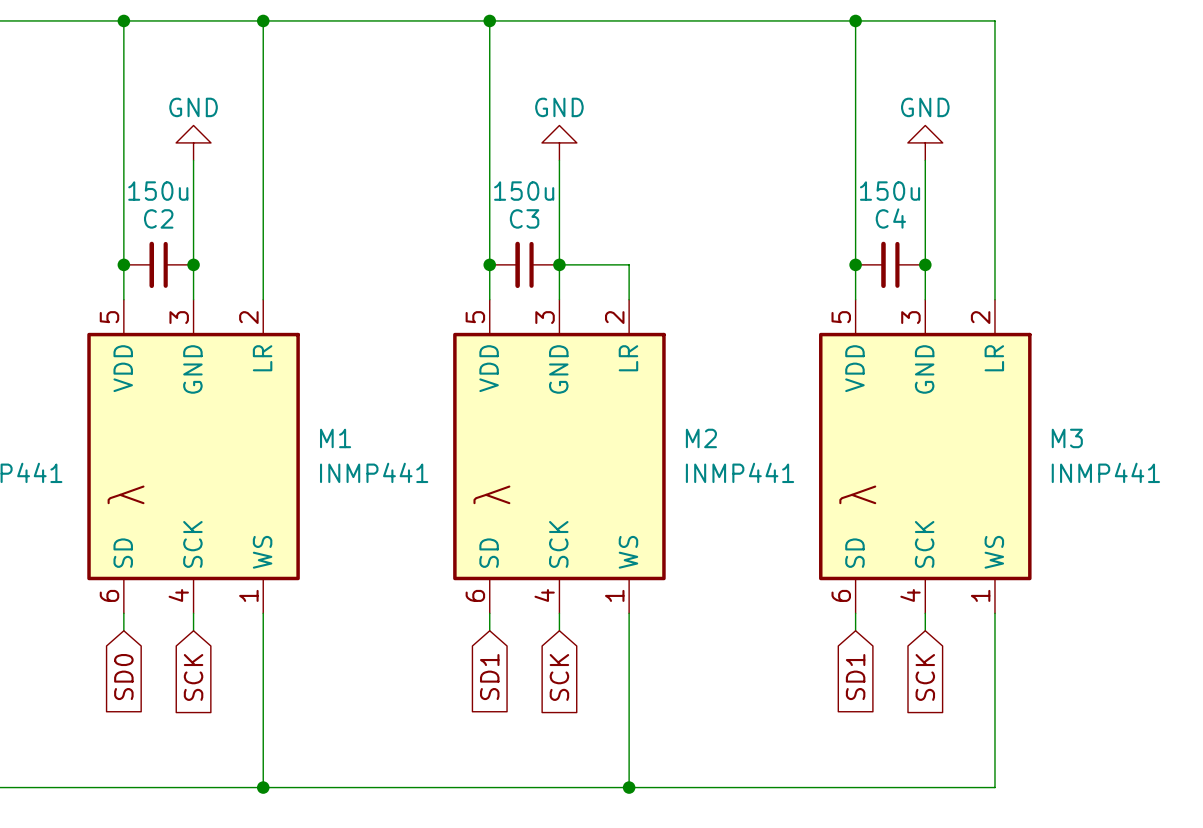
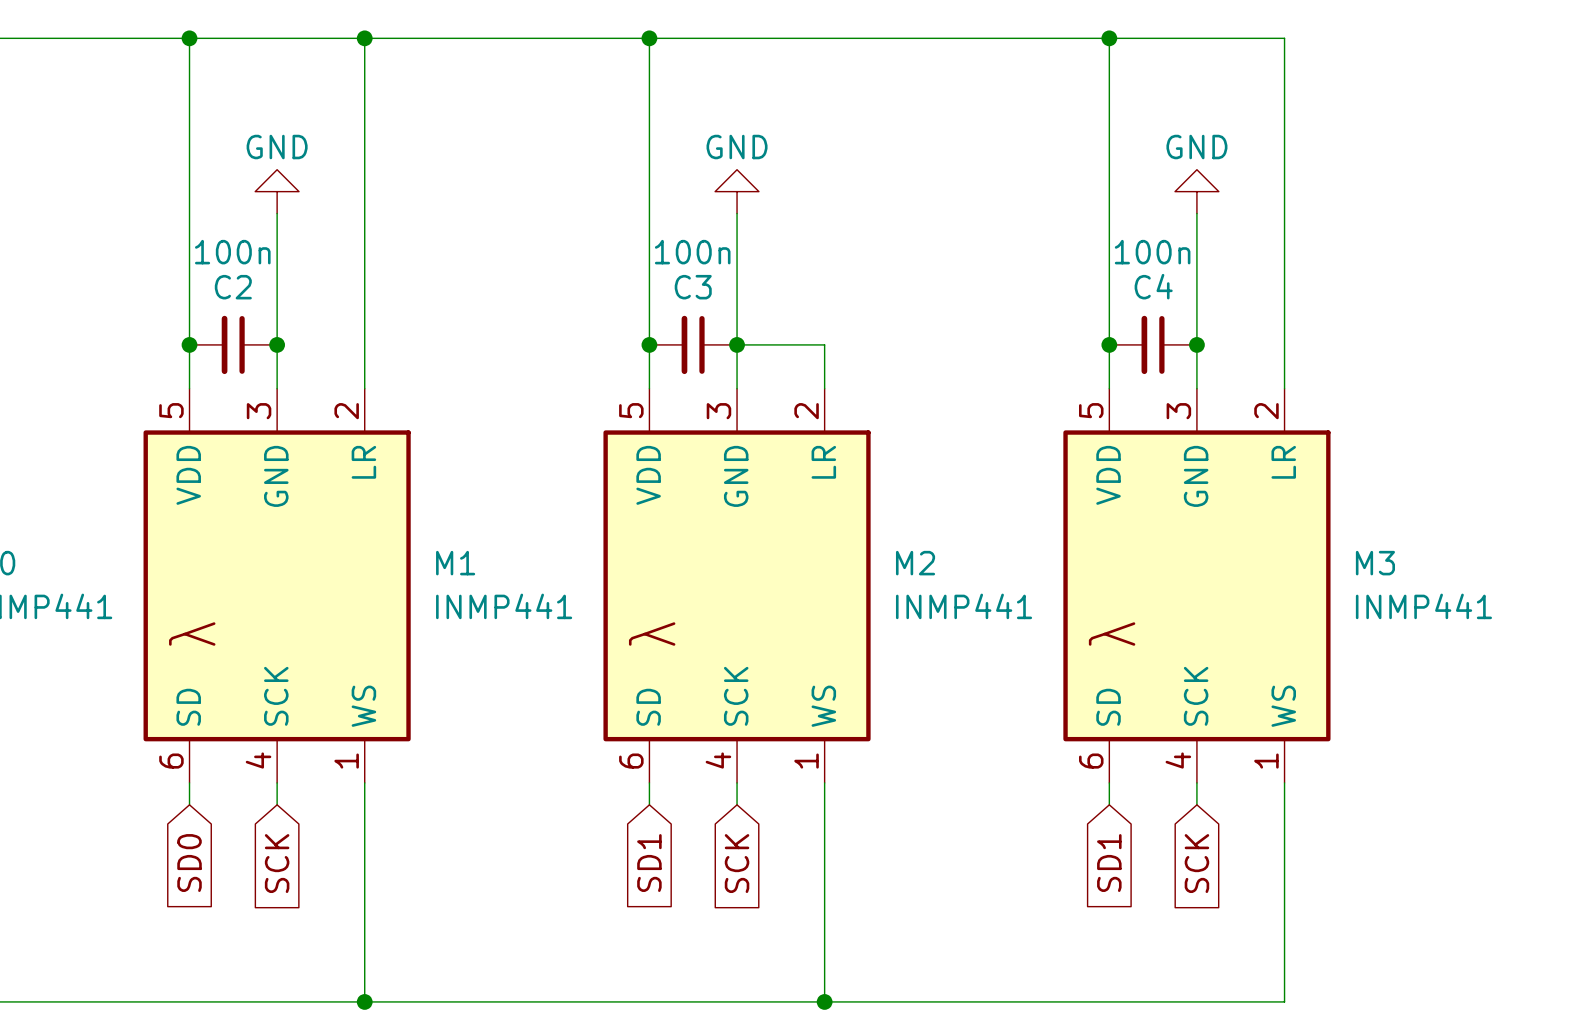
C2 value: 150u (158, 191) -> 100n (232, 252)
C3 value: 150u (524, 191) -> 100n (692, 252)
C4 value: 150u (890, 191) -> 100n (1152, 252)

